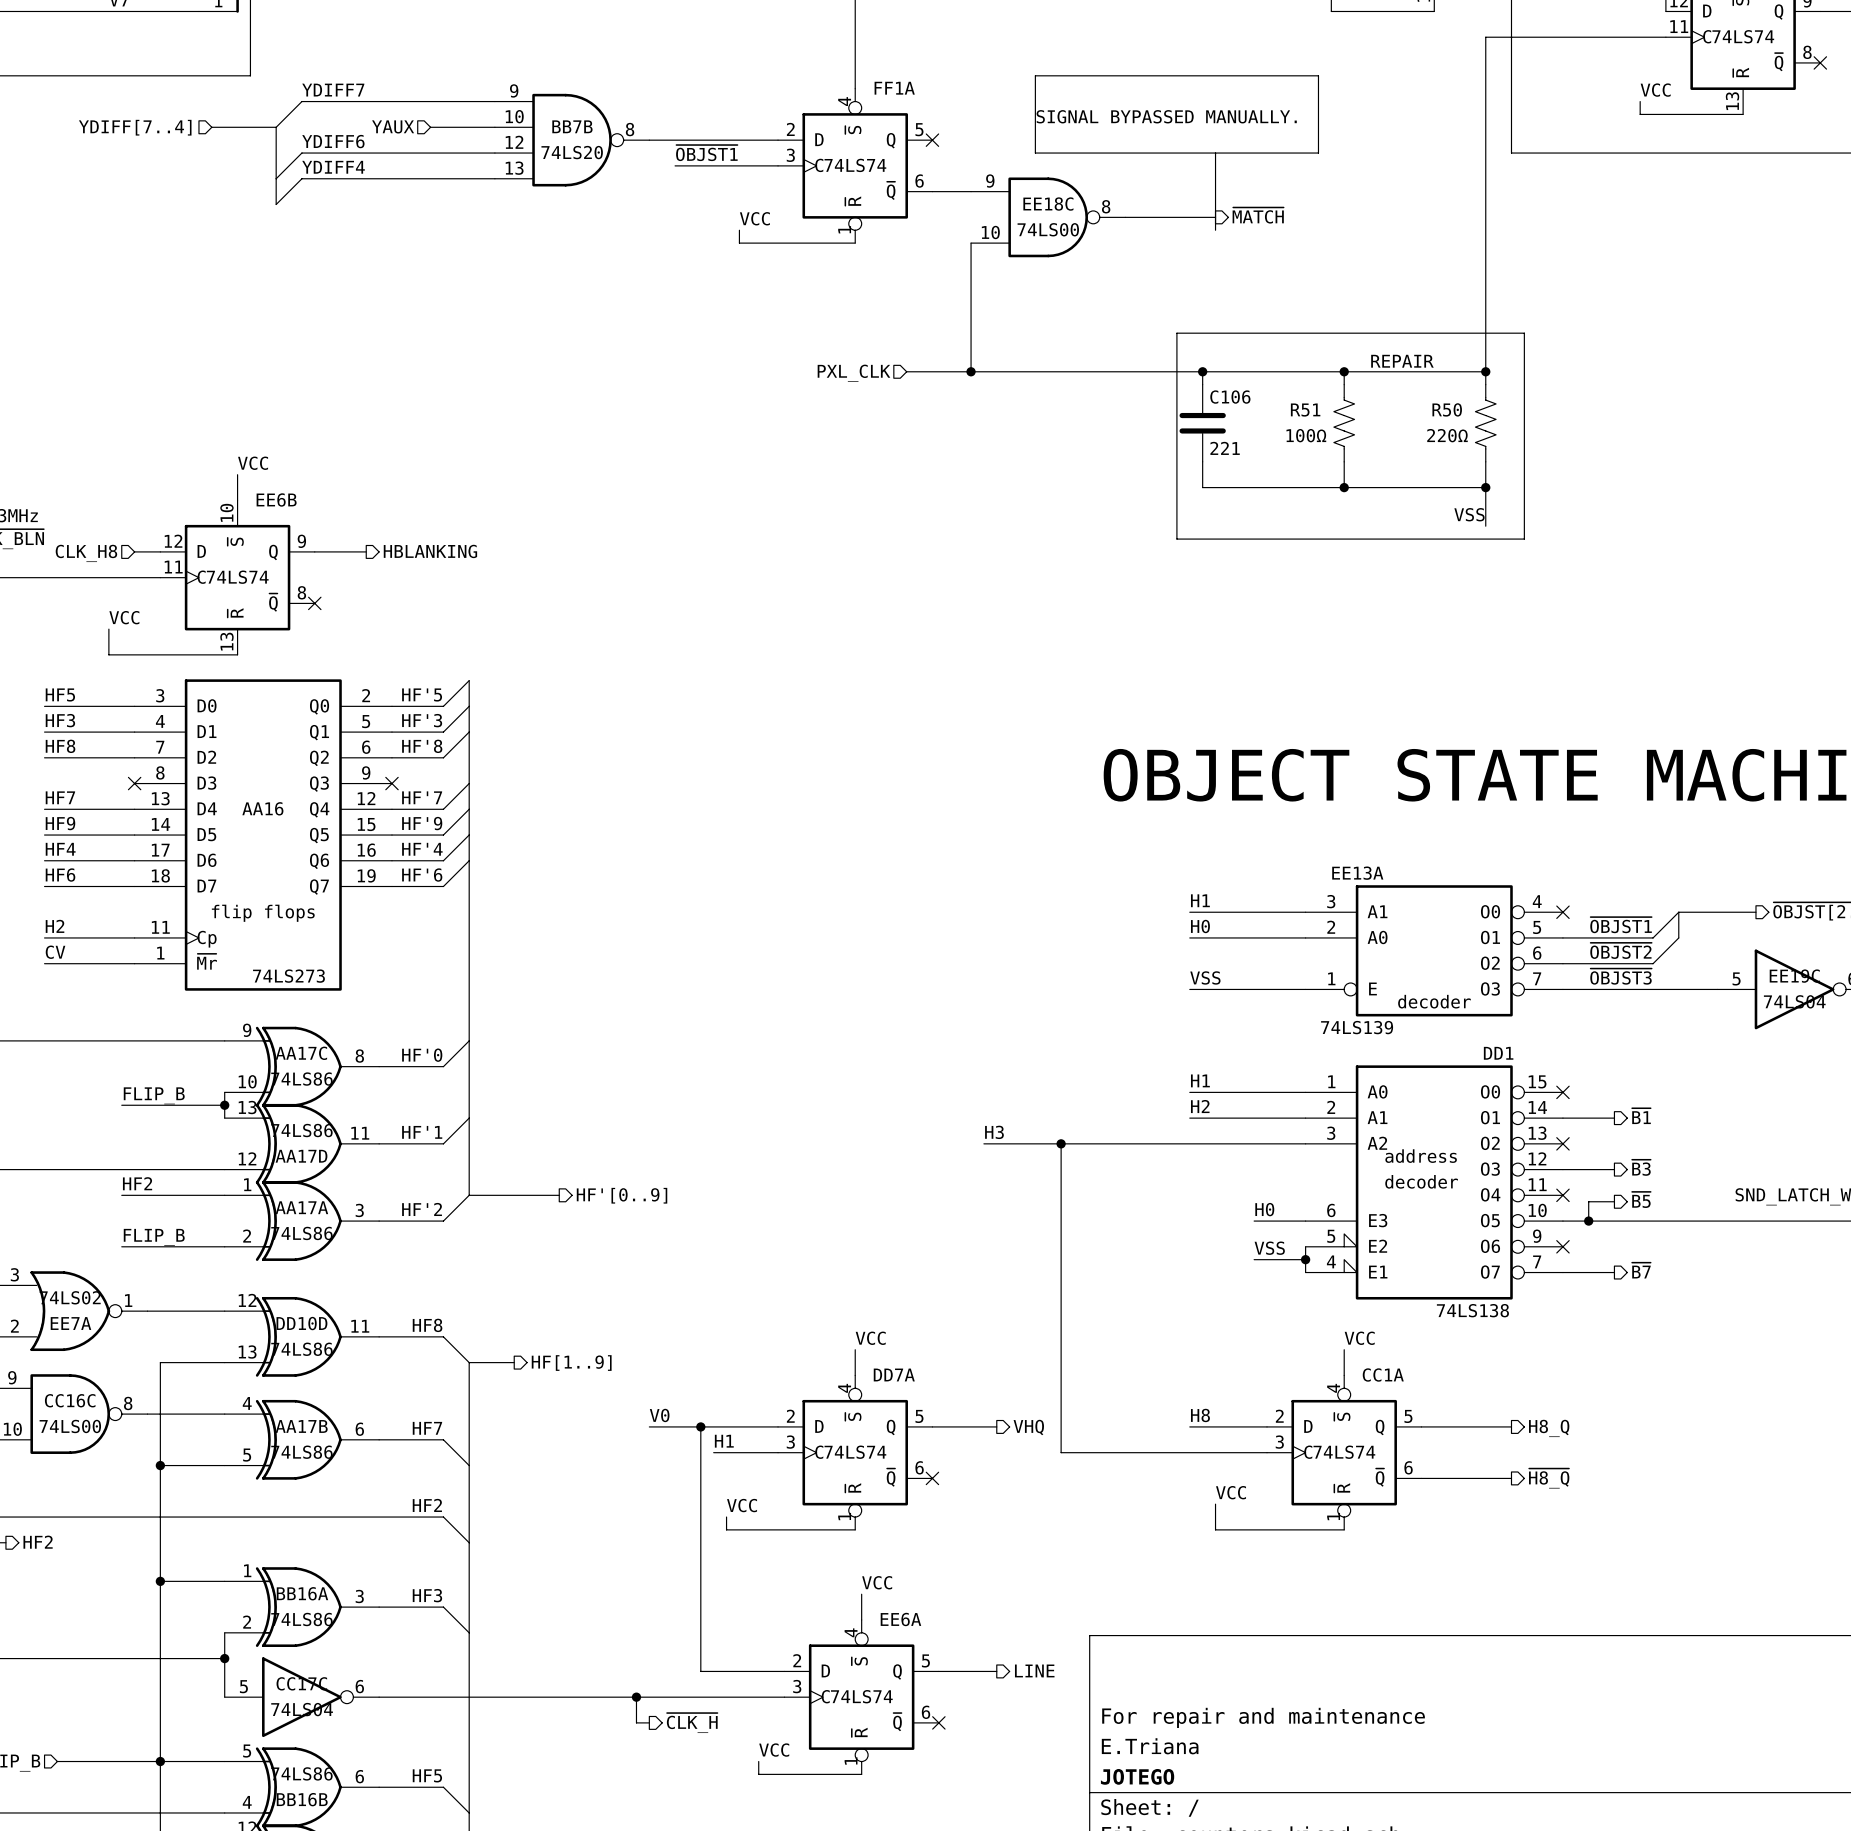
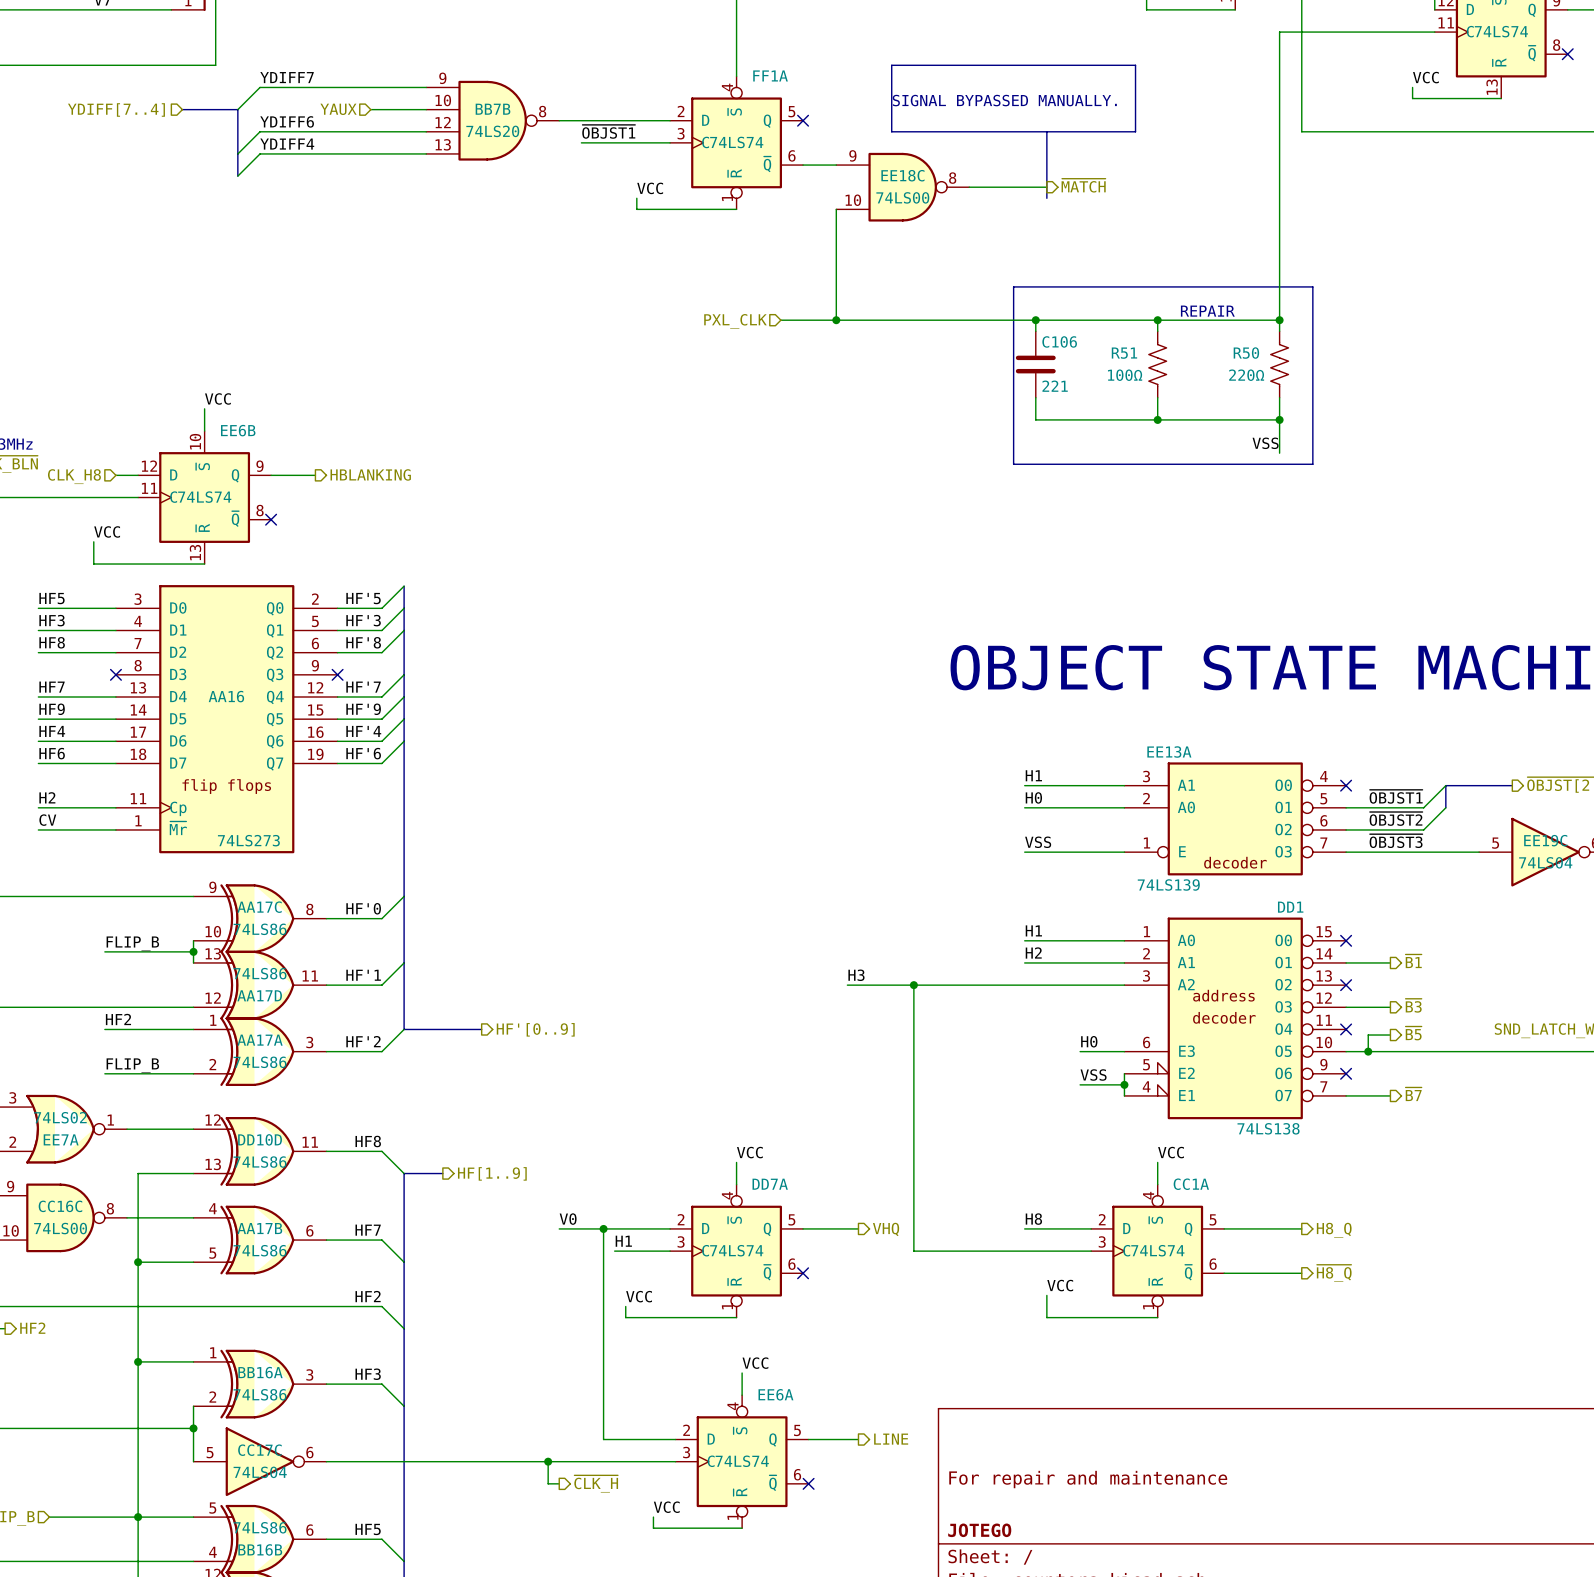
title block: E.Triana (1150, 1746) -> none

